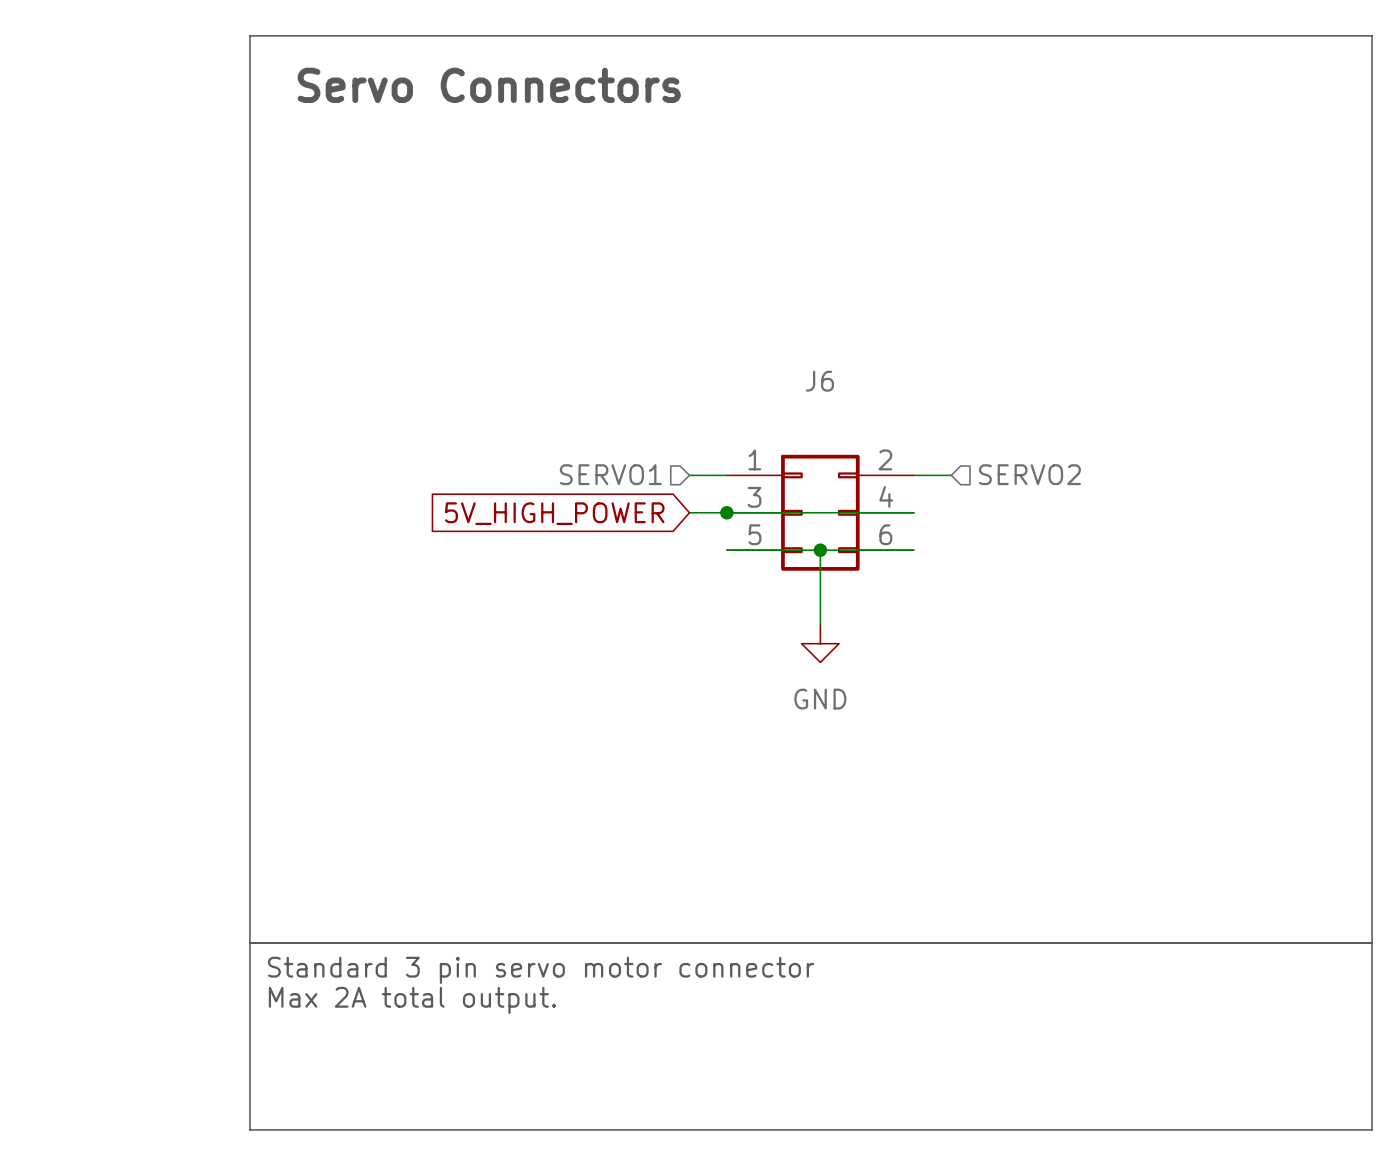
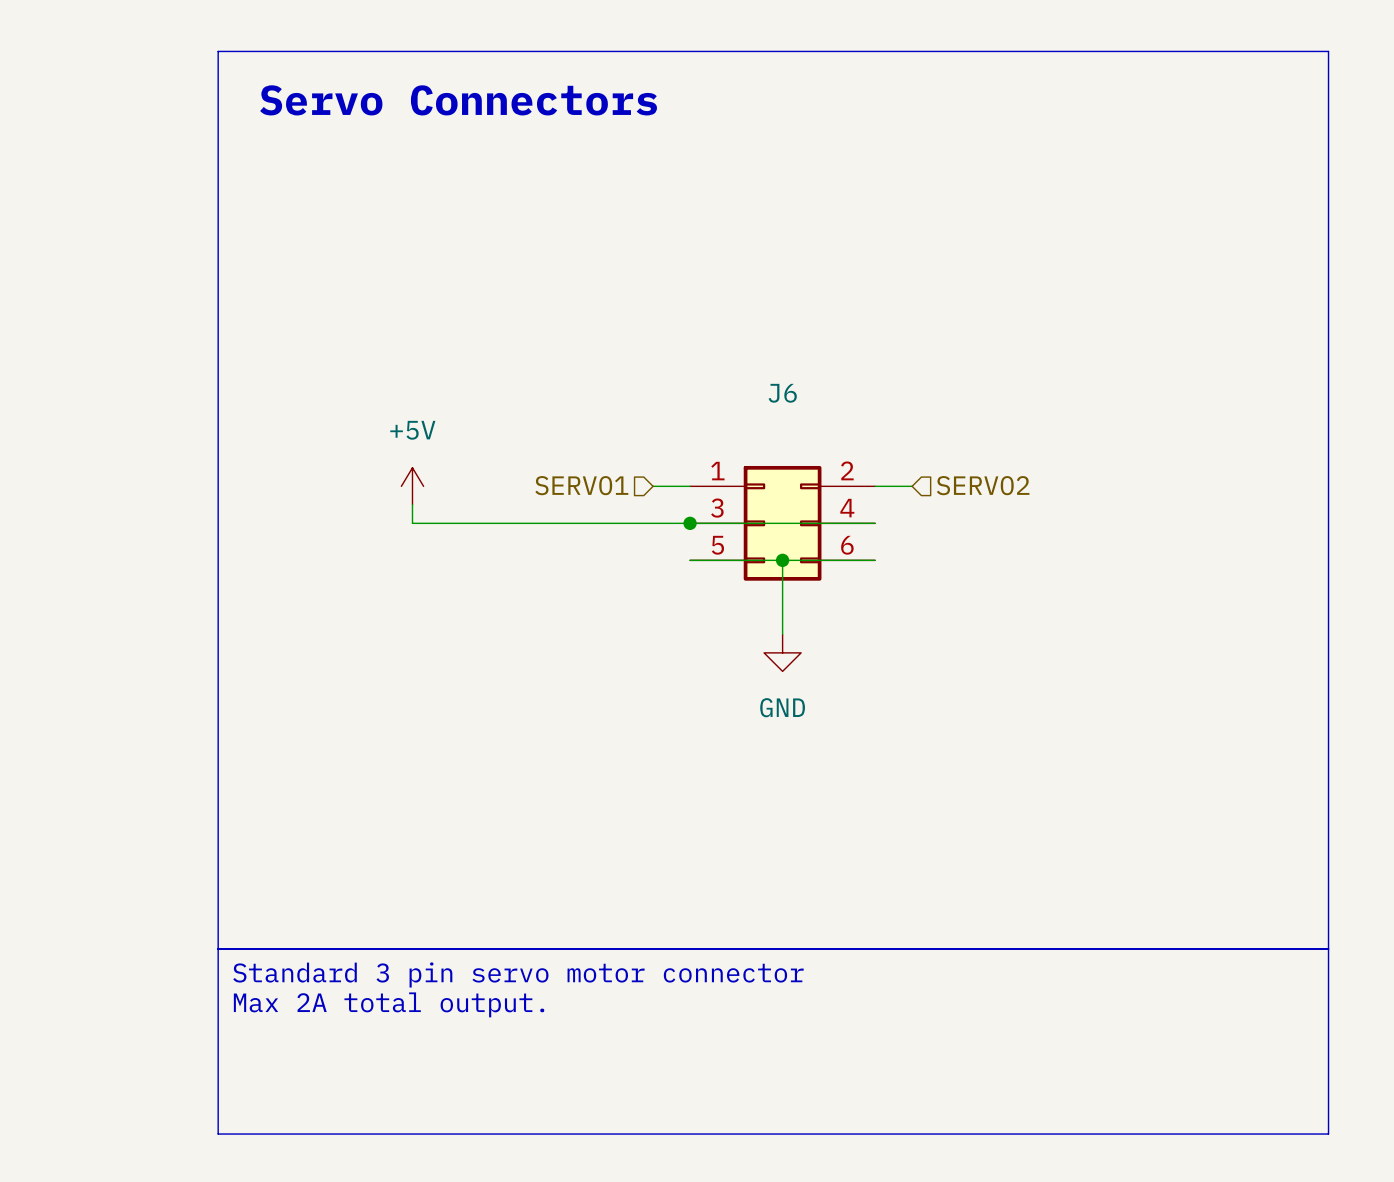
power symbol: none -> +5V (412, 486)
wire: none -> (412, 504) (412, 523) (653, 523)
global label: 5V_HIGH_POWER (554, 513) -> none

